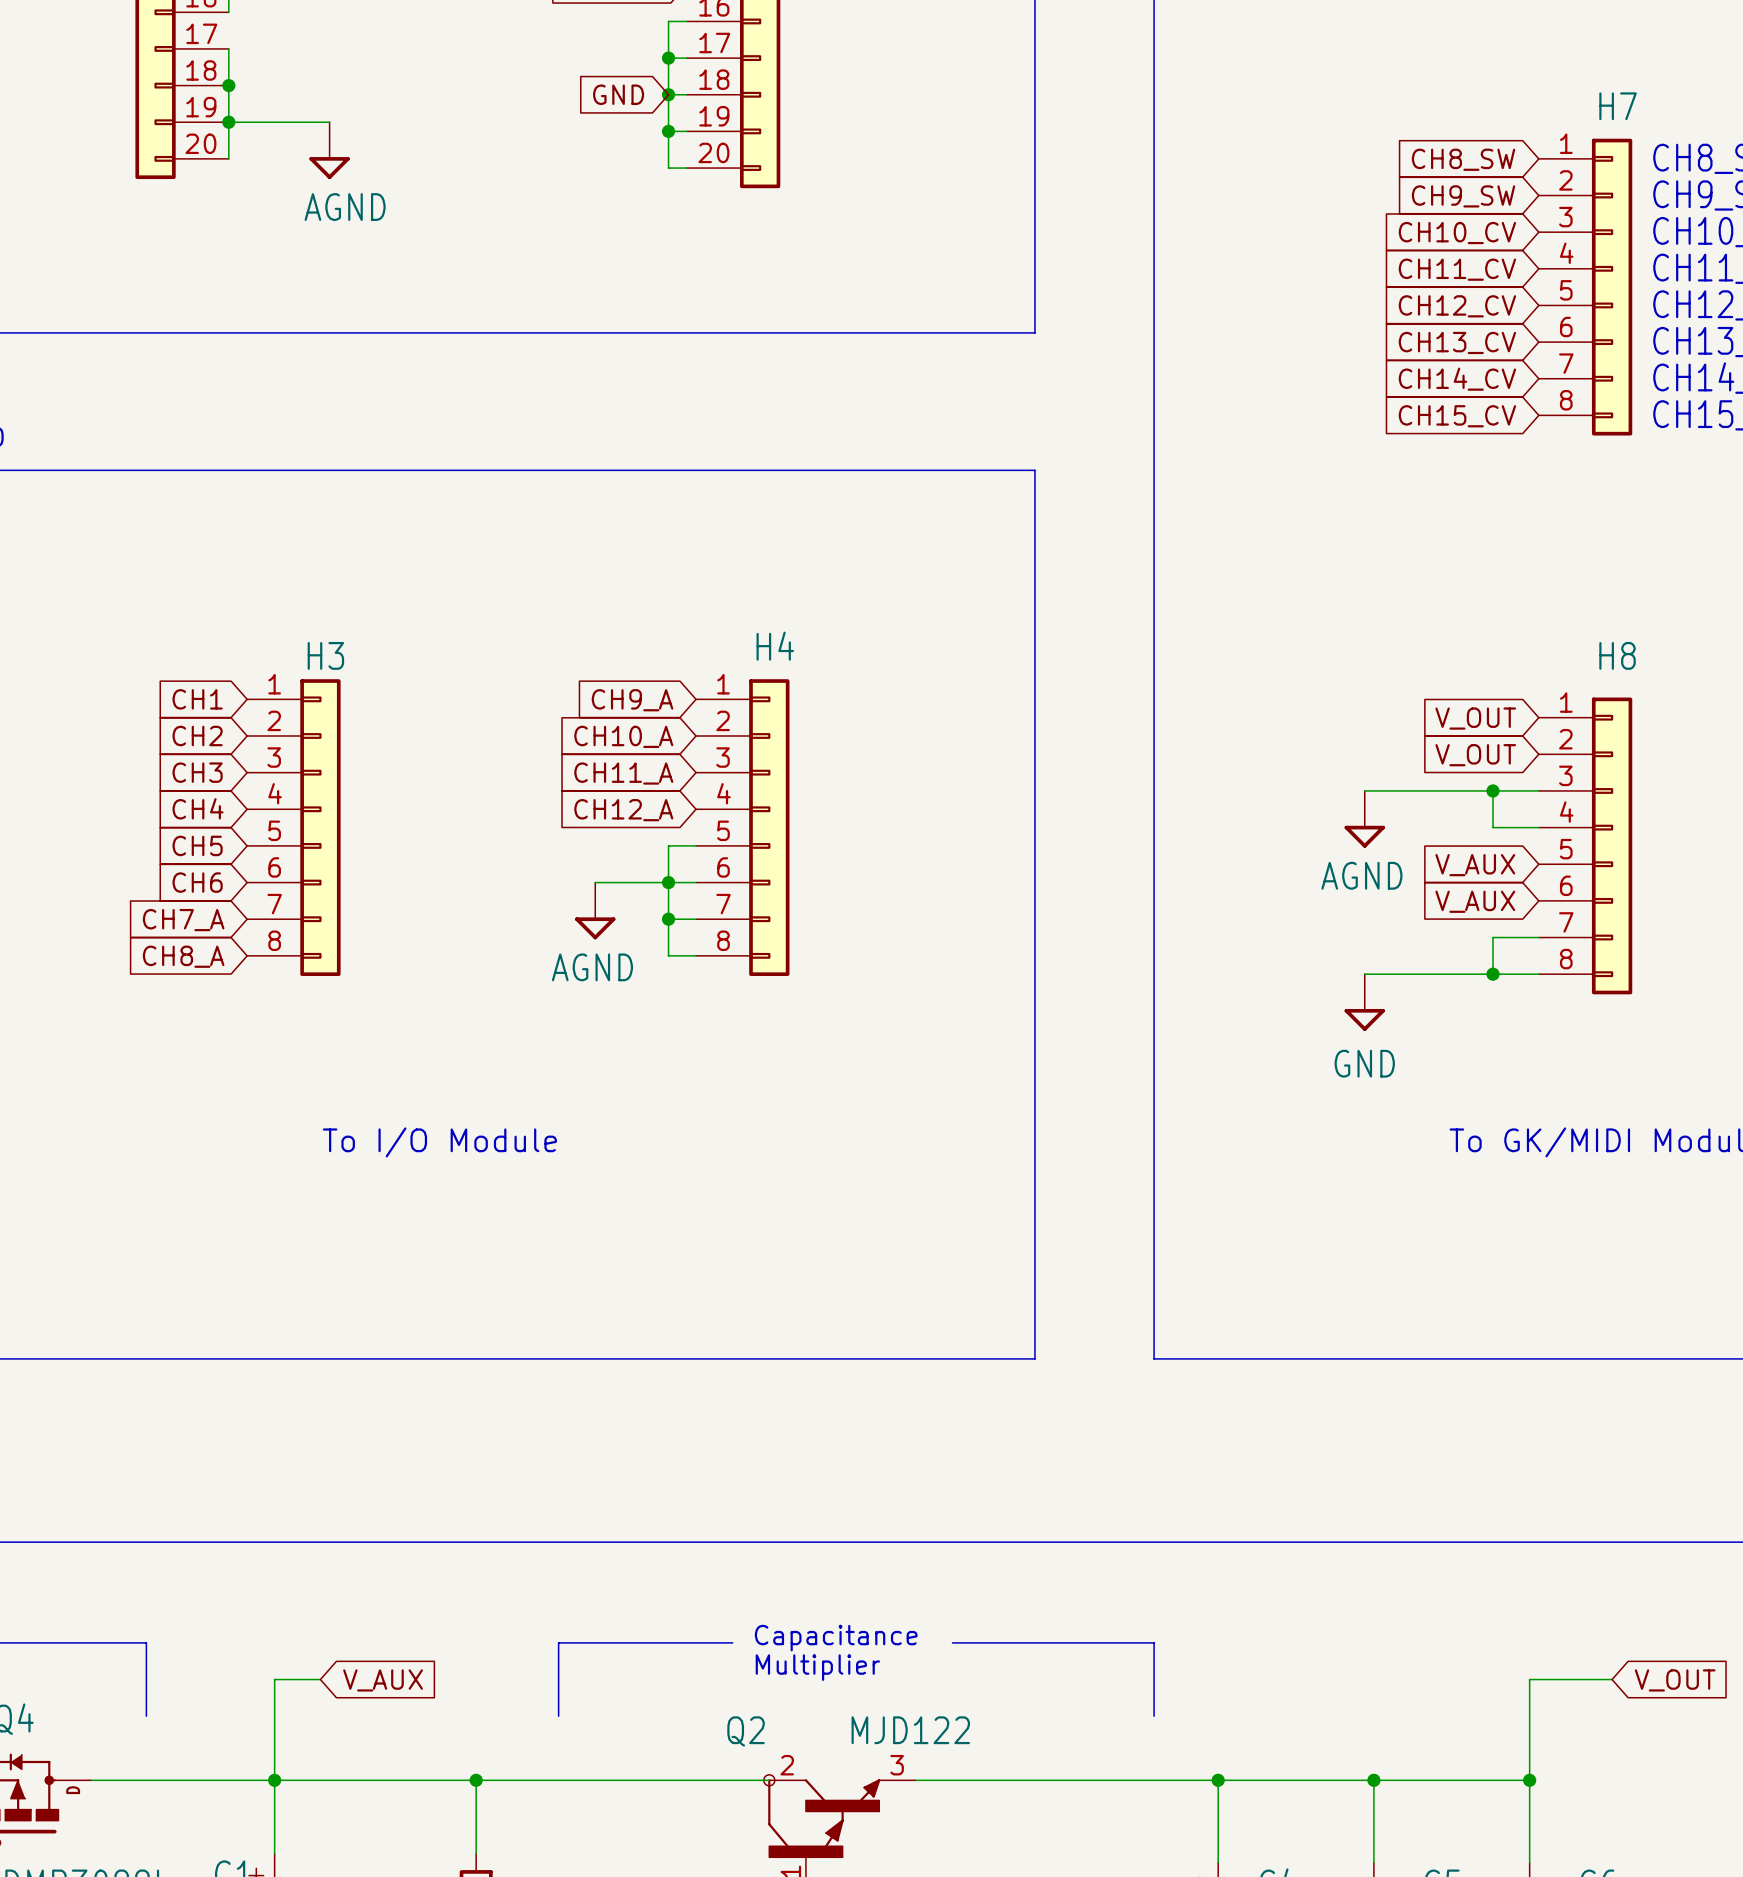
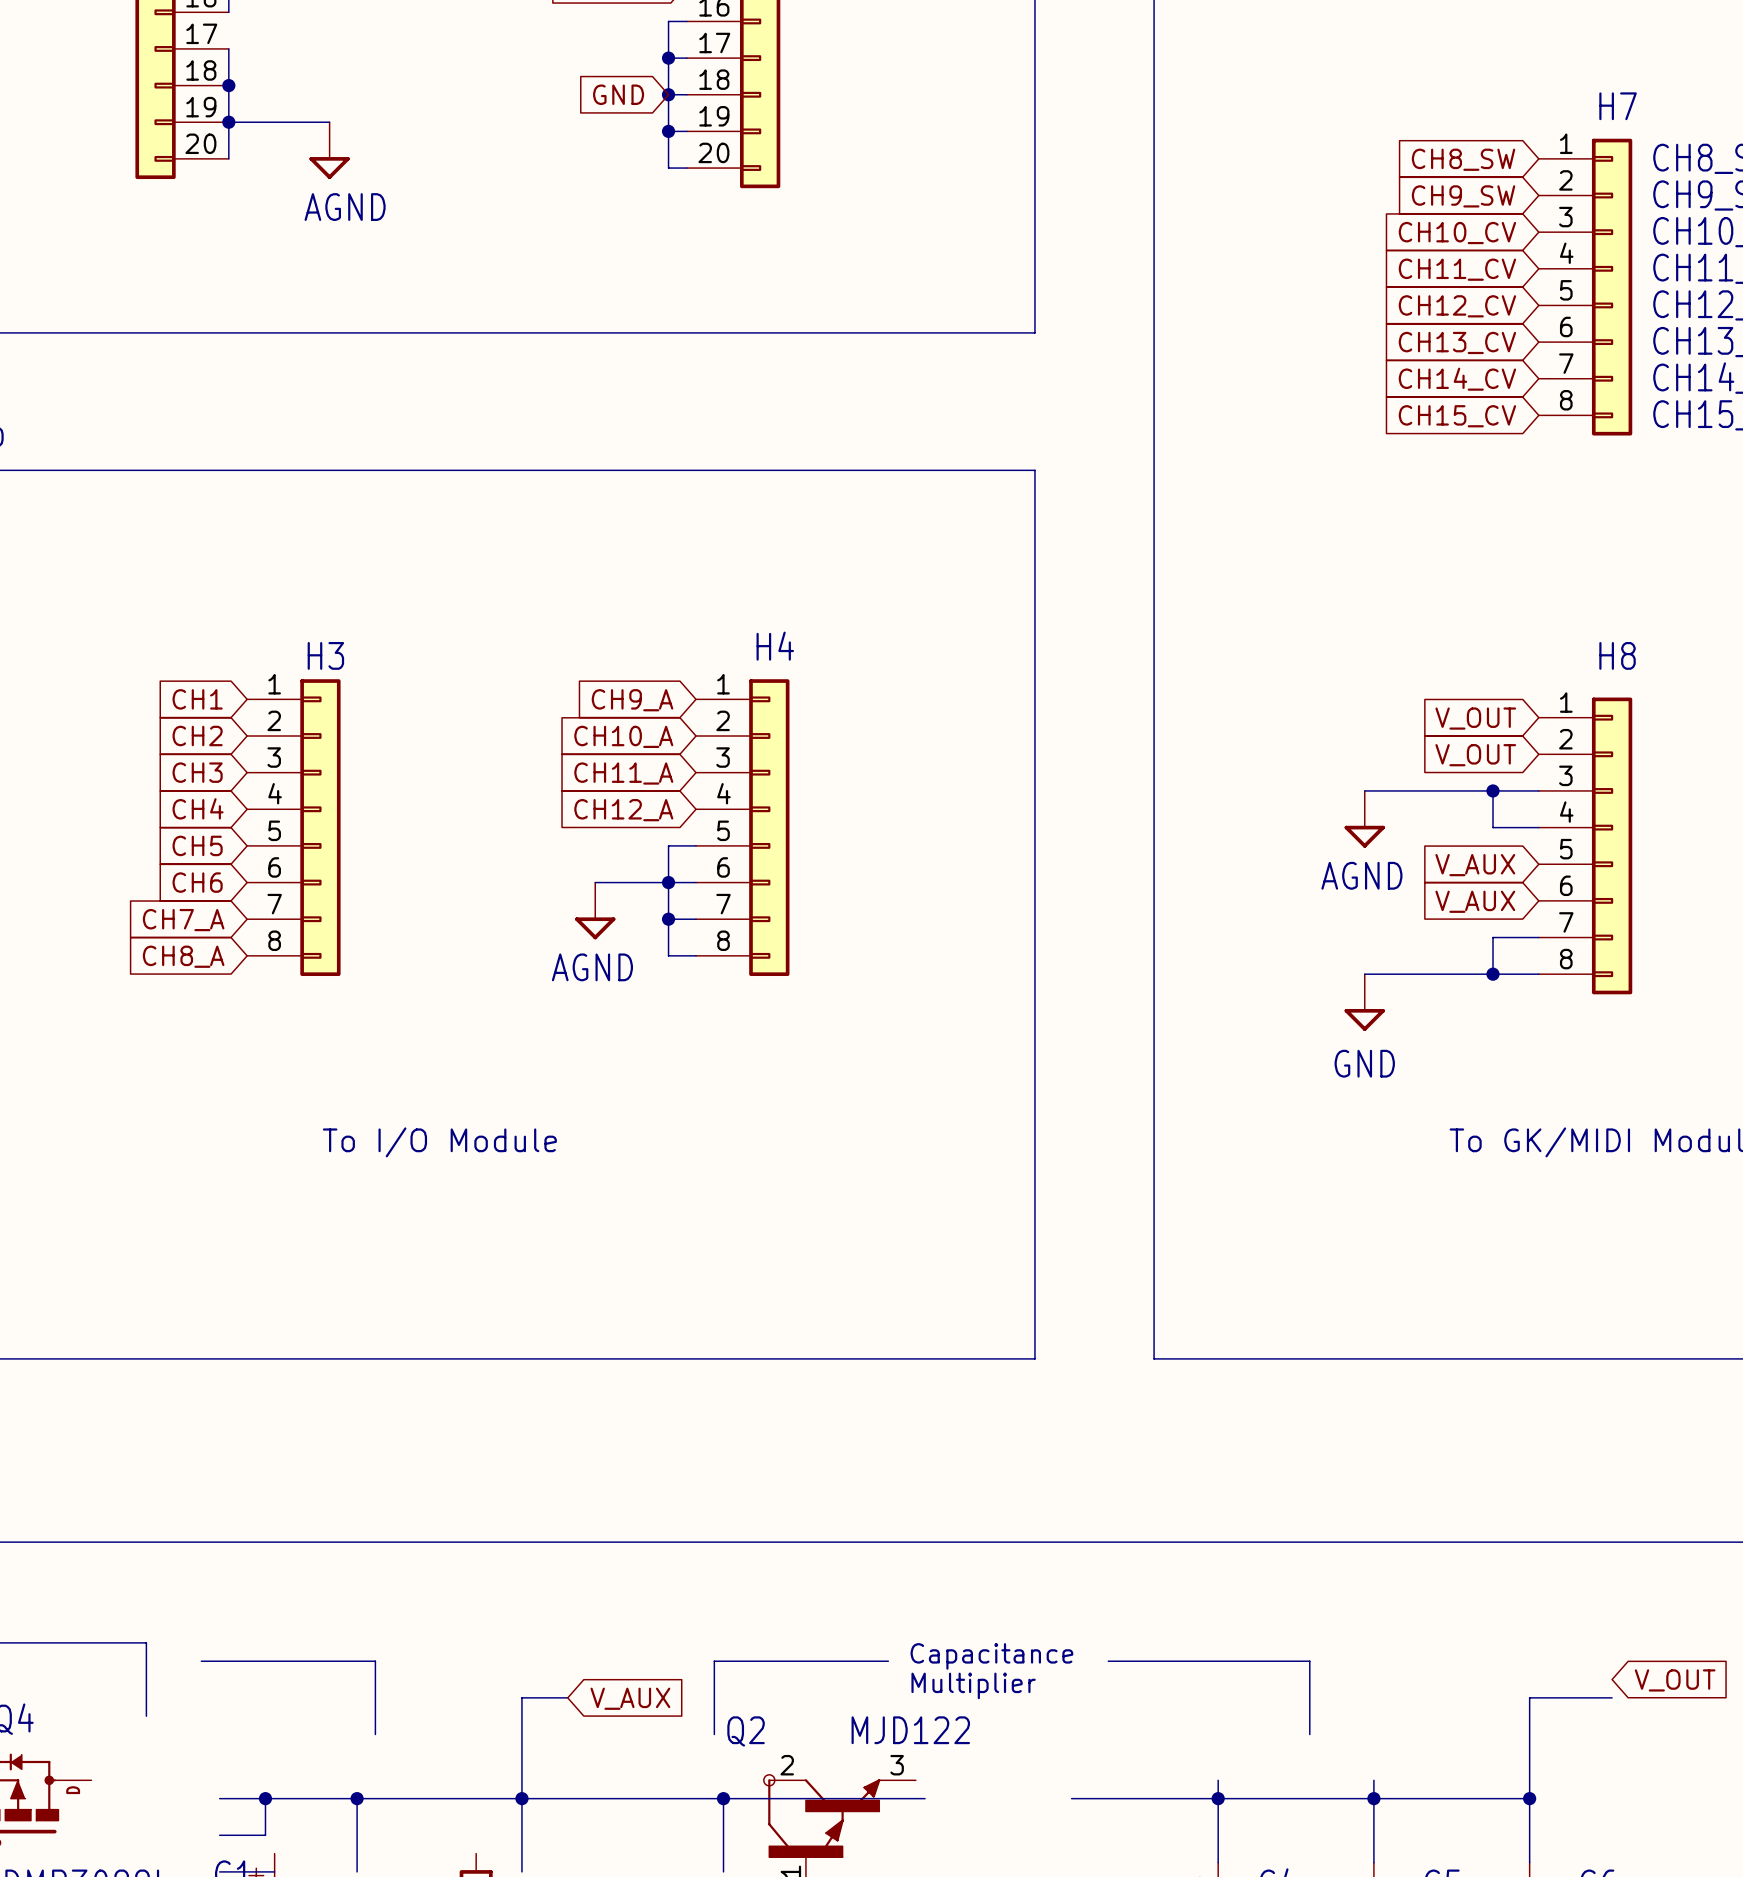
text position: Capacitance (836, 1638) -> Capacitance (991, 1656)
line: (732, 1642) (558, 1642) (558, 1716) -> (888, 1661) (714, 1661) (714, 1734)
line: (952, 1642) (1154, 1642) (1154, 1716) -> (1108, 1661) (1309, 1661) (1309, 1734)
line: none -> (201, 1661) (375, 1661) (375, 1734)
text position: Multiplier (817, 1667) -> Multiplier (973, 1685)
wire: (320, 1679) (274, 1679) (274, 1853) -> (567, 1697) (521, 1697) (521, 1871)
wire: (1612, 1679) (1529, 1679) (1529, 1697) -> (1612, 1697) (1529, 1697)
global label position: V_AUX (383, 1680) -> V_AUX (630, 1698)
wire: (91, 1780) (769, 1780) -> none
junction position: (274, 1780) -> (265, 1798)
wire: (476, 1780) (476, 1853) -> (723, 1798) (723, 1871)
junction position: (476, 1780) -> (521, 1798)
wire: (915, 1780) (1529, 1780) -> none
junction position: (1218, 1780) -> (1218, 1798)
junction position: (1373, 1780) -> (1373, 1798)
junction position: (1529, 1780) -> (1529, 1798)
wire: none -> (219, 1798) (925, 1798)
wire: none -> (265, 1798) (265, 1835) (219, 1835)
wire: none -> (357, 1798) (357, 1871)
junction: none -> (357, 1798)
junction: none -> (723, 1798)
wire: none -> (1071, 1798) (1529, 1798)
wire: none -> (219, 1871) (274, 1871)

